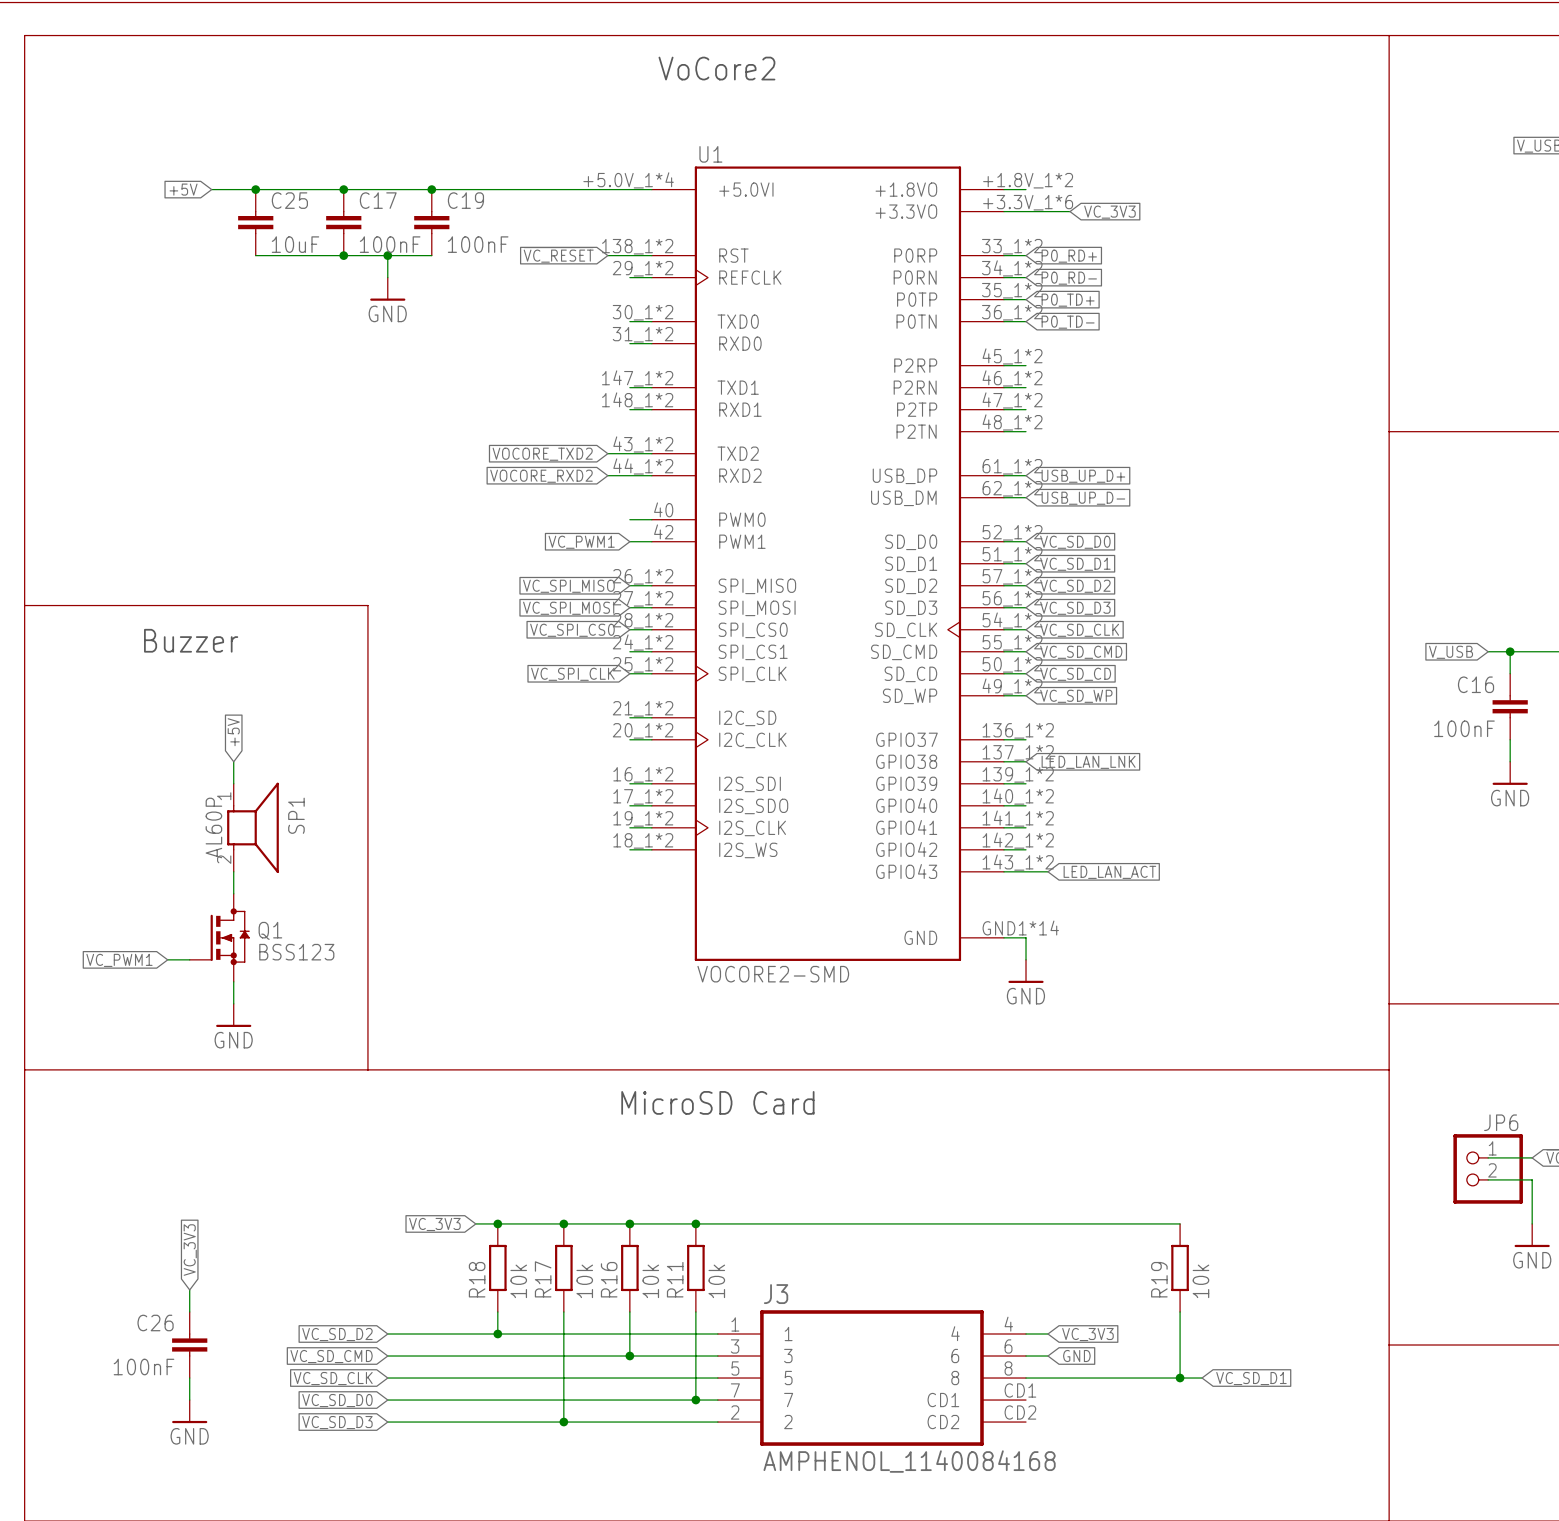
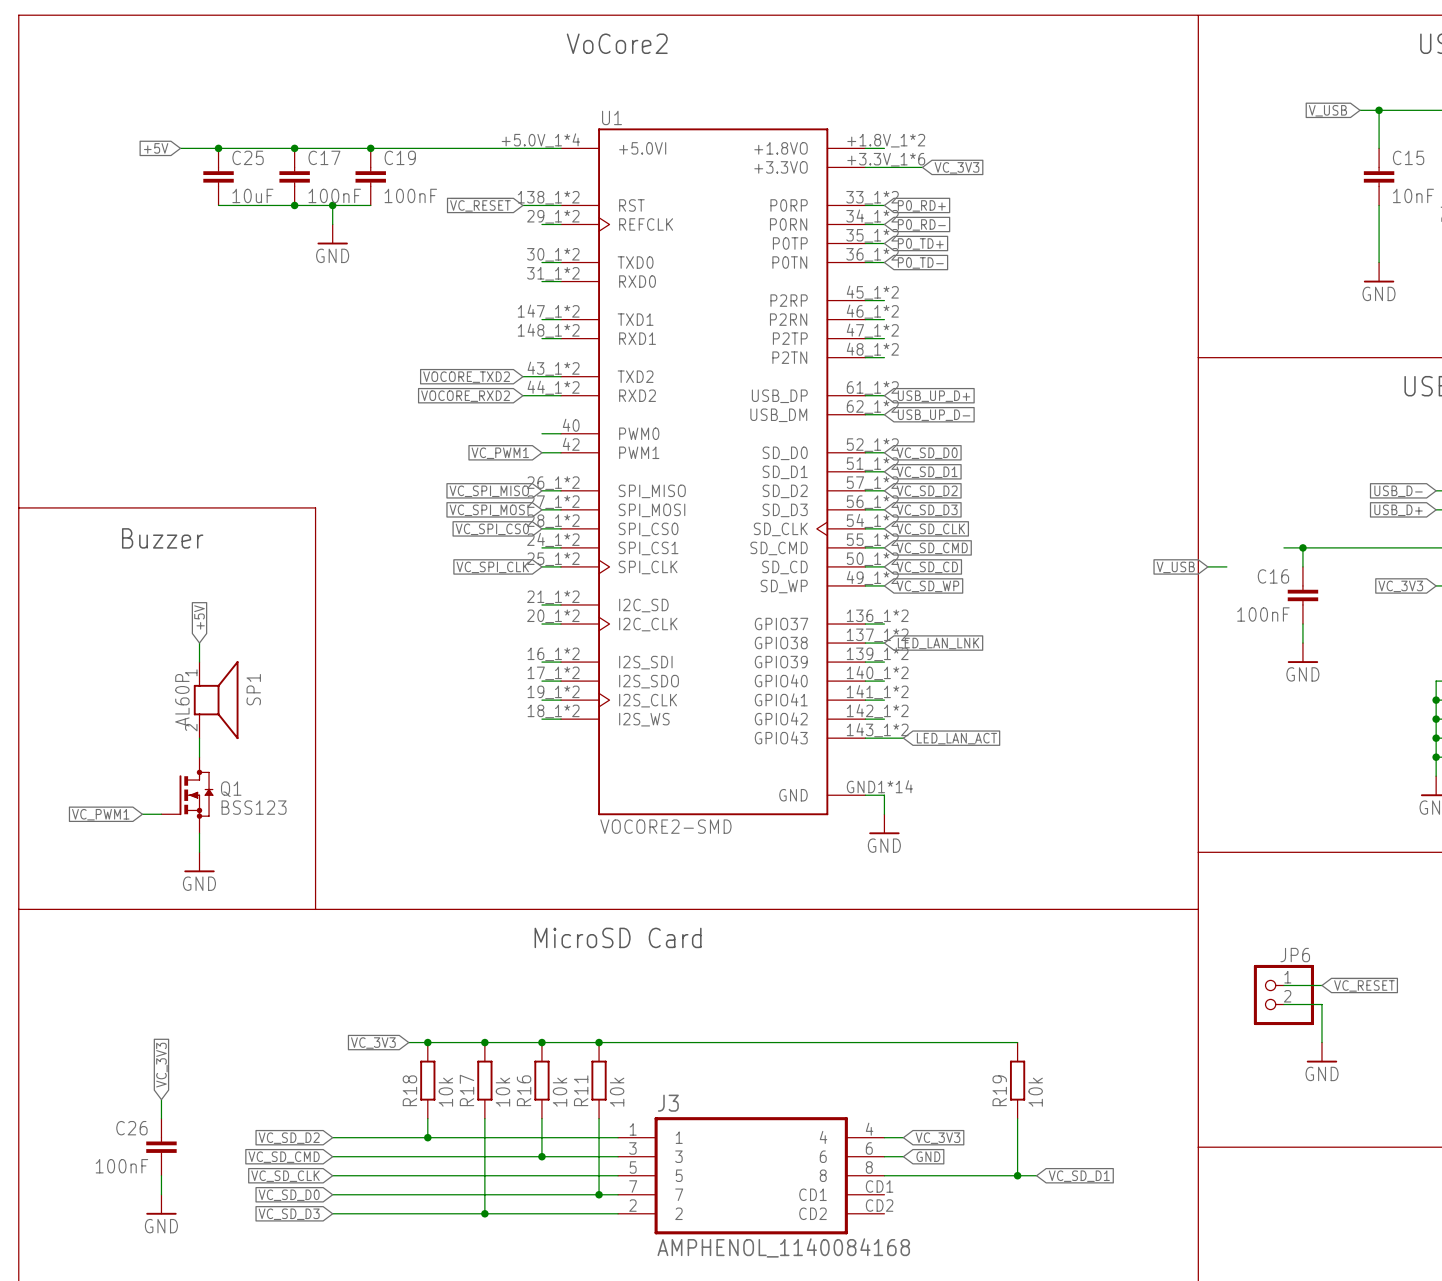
global label position: V_USB (1451, 652) -> V_USB (1175, 567)
wire: none -> (1207, 566) (1226, 566)

